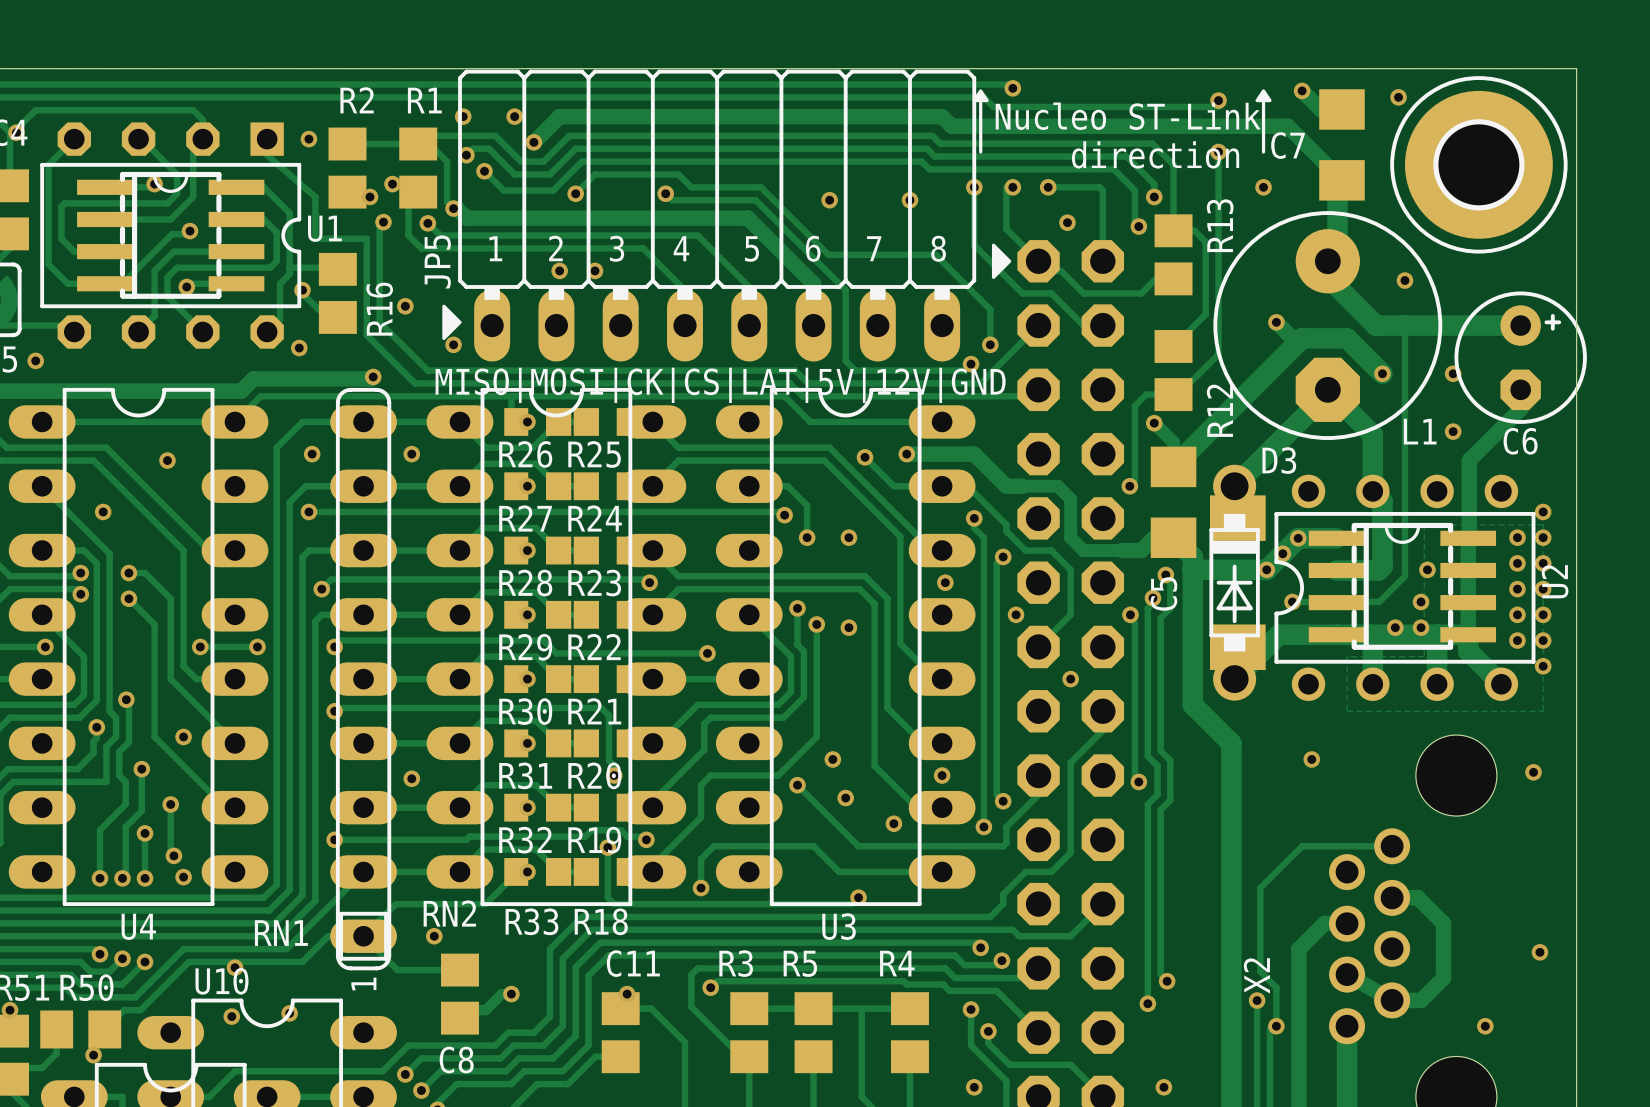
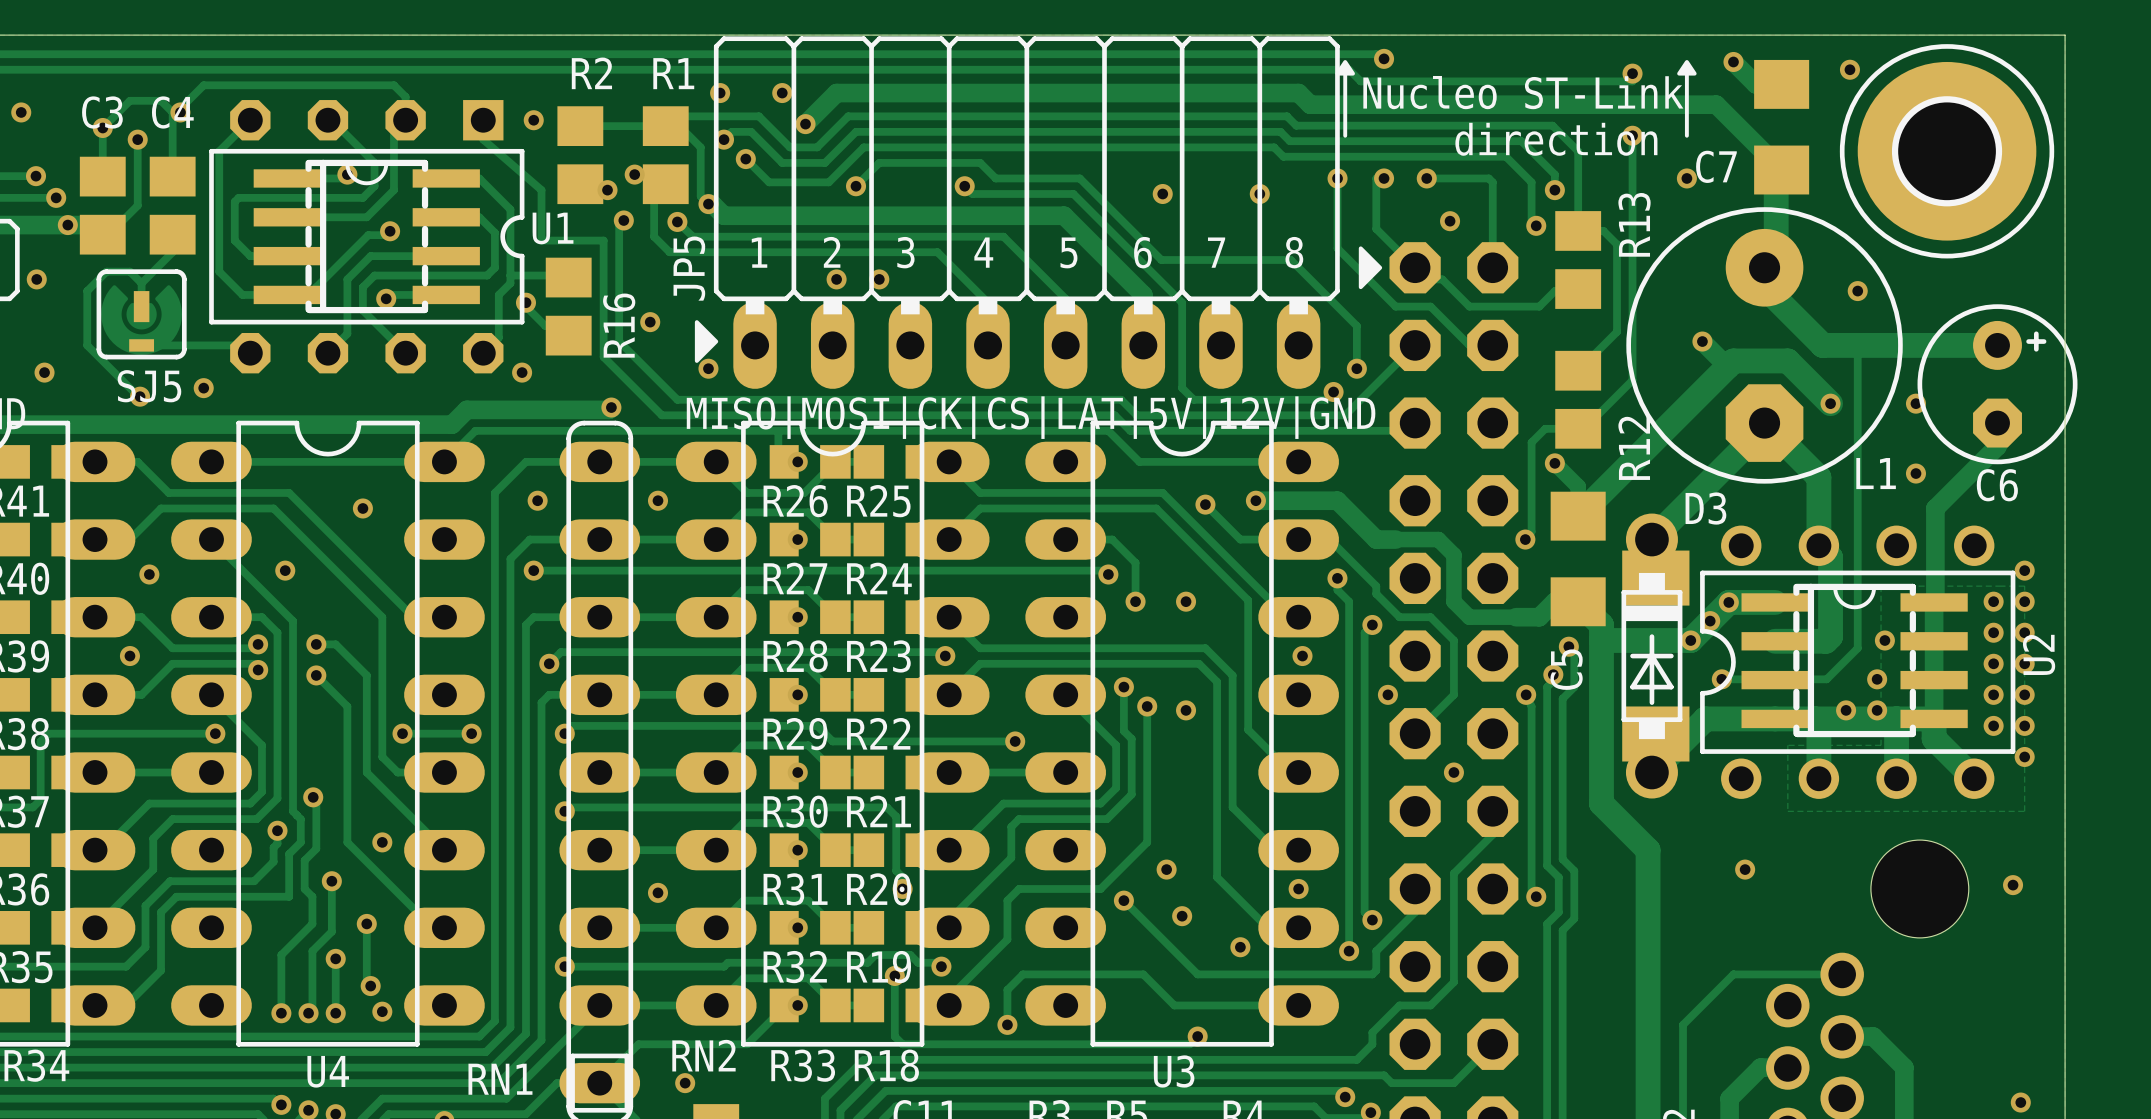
C7 name position: C7 (1288, 145) -> C7 (1716, 166)

